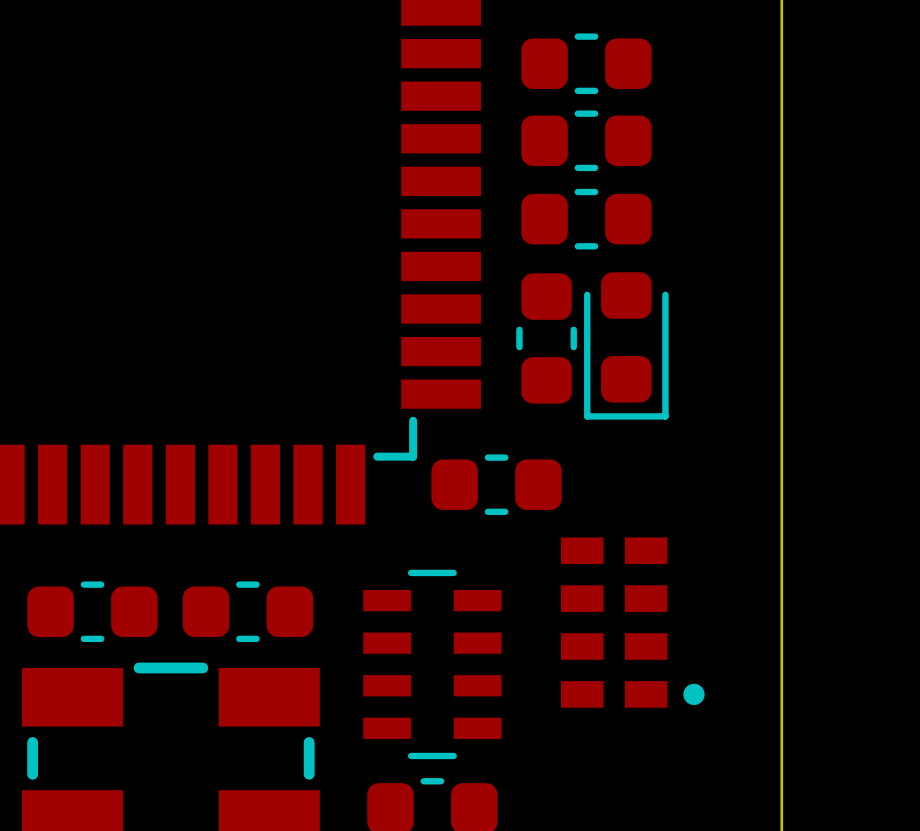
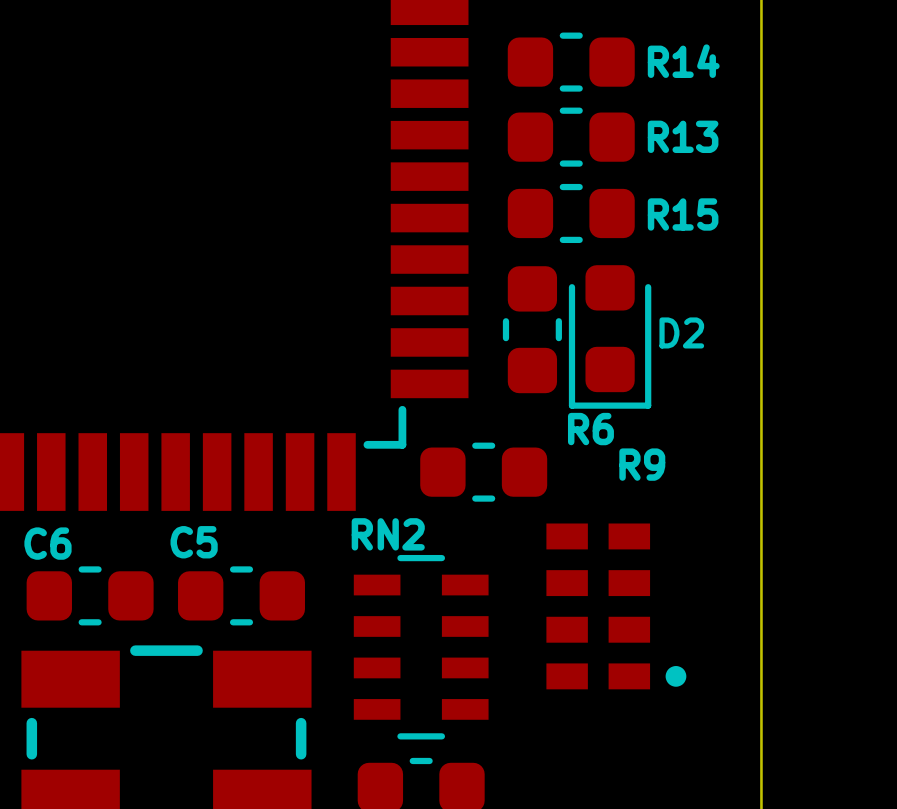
R14 name: none -> R14 (683, 61)
R13 name: none -> R13 (683, 136)
R15 name: none -> R15 (683, 214)
D2 name: none -> D2 (681, 332)
R6 name: none -> R6 (590, 429)
R9 name: none -> R9 (642, 464)
RN2 name: none -> RN2 (388, 534)
C5 name: none -> C5 (194, 542)
C6 name: none -> C6 (47, 543)

